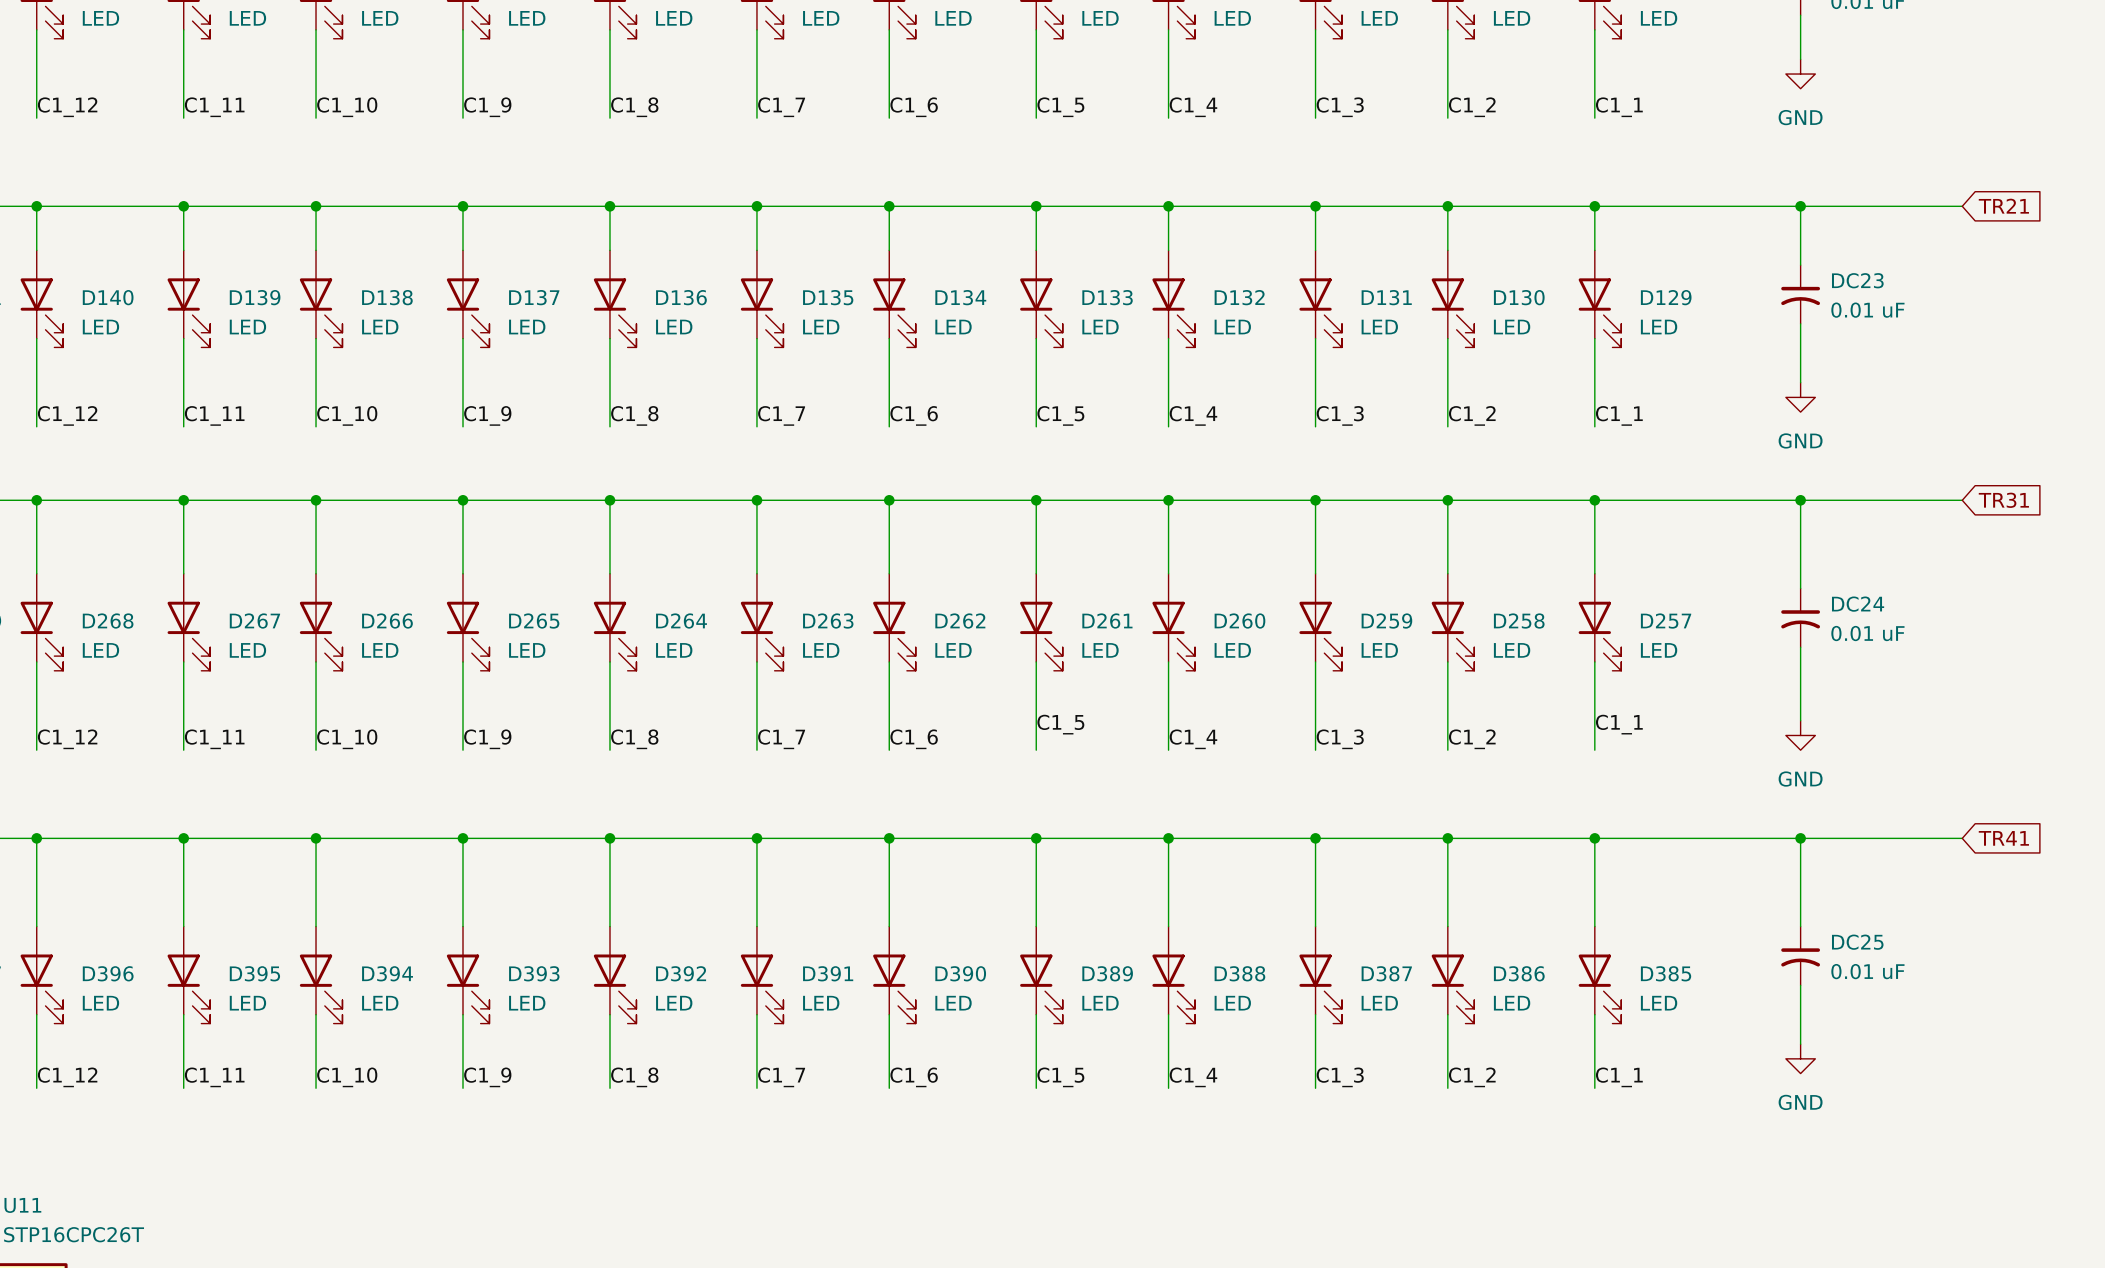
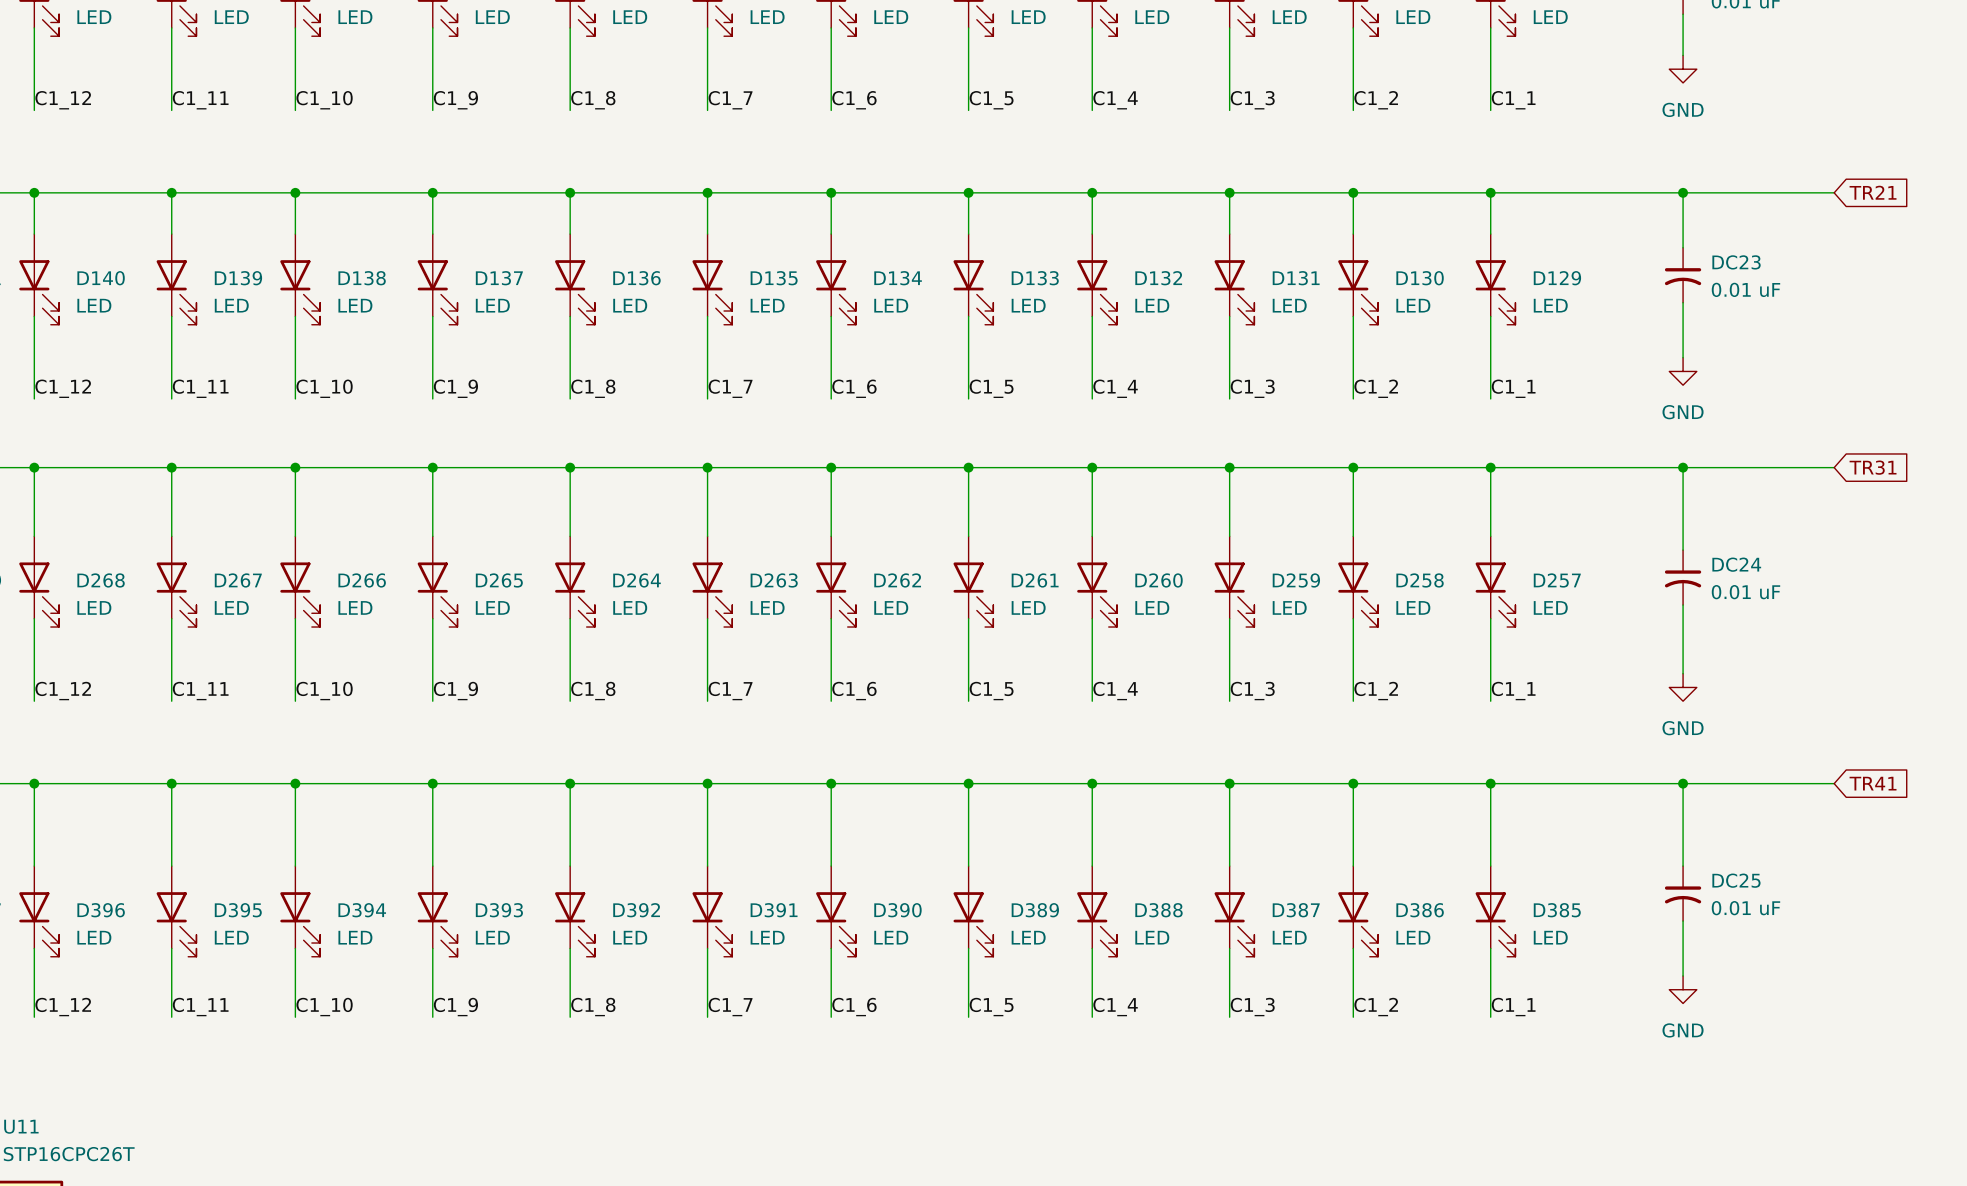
label position: C1_5 (1060, 724) -> C1_5 (991, 691)
label position: C1_1 (1619, 724) -> C1_1 (1513, 691)

